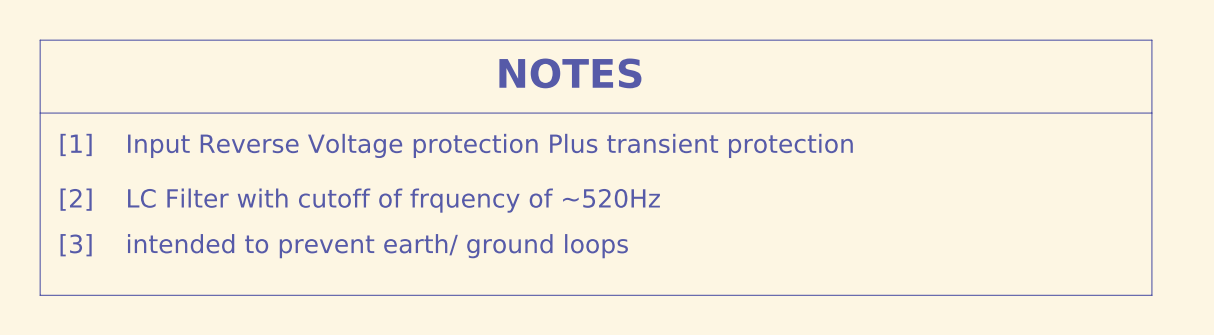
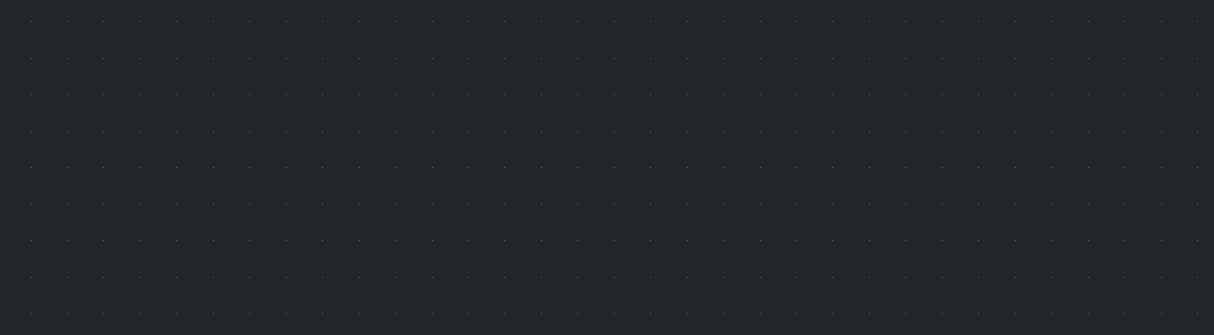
line: (40, 40) (1151, 40) (1151, 295) (40, 295) (40, 40) -> none
text: NOTES (570, 73) -> none
line: (40, 113) (1151, 113) -> none
text: [1] Input Reverse Voltage protection Plus transient protection (456, 145) -> none
text: [2] LC Filter with cutoff of frquency of ~520Hz (360, 200) -> none
text: [3] intended to prevent earth/ ground loops (344, 246) -> none

